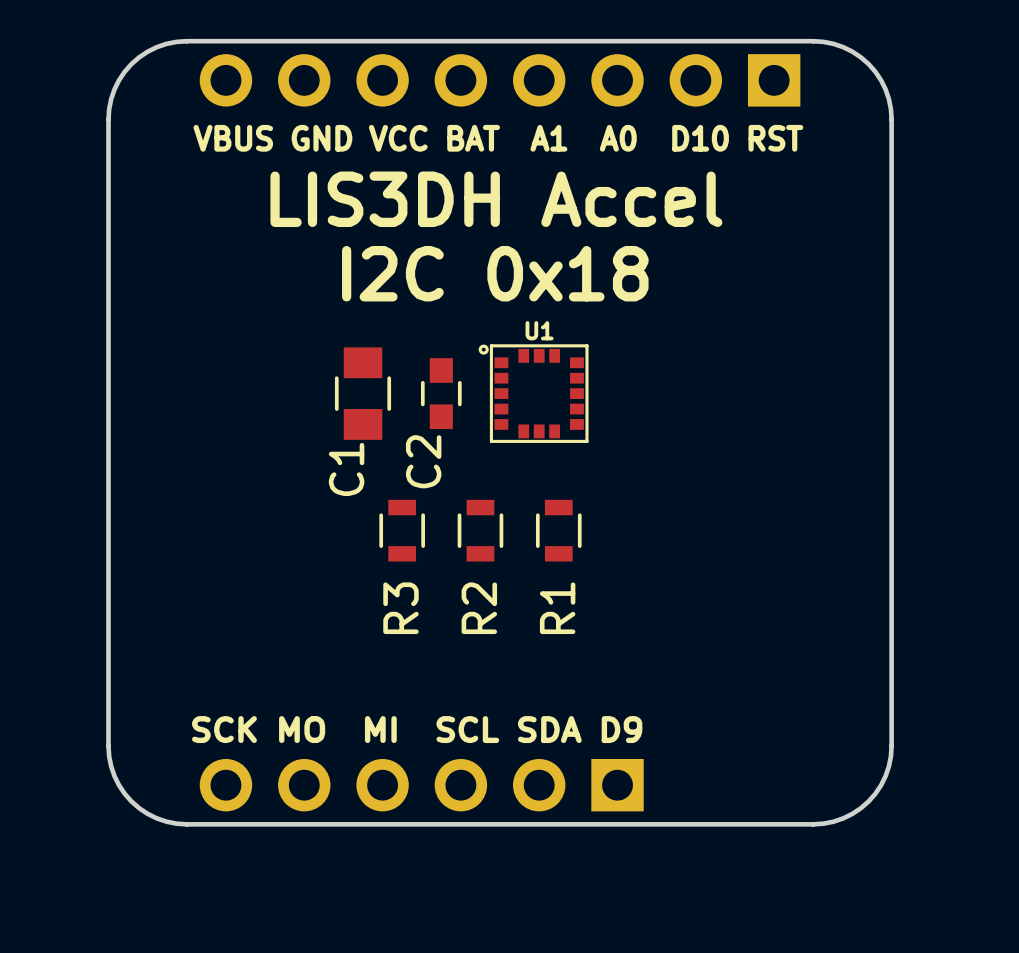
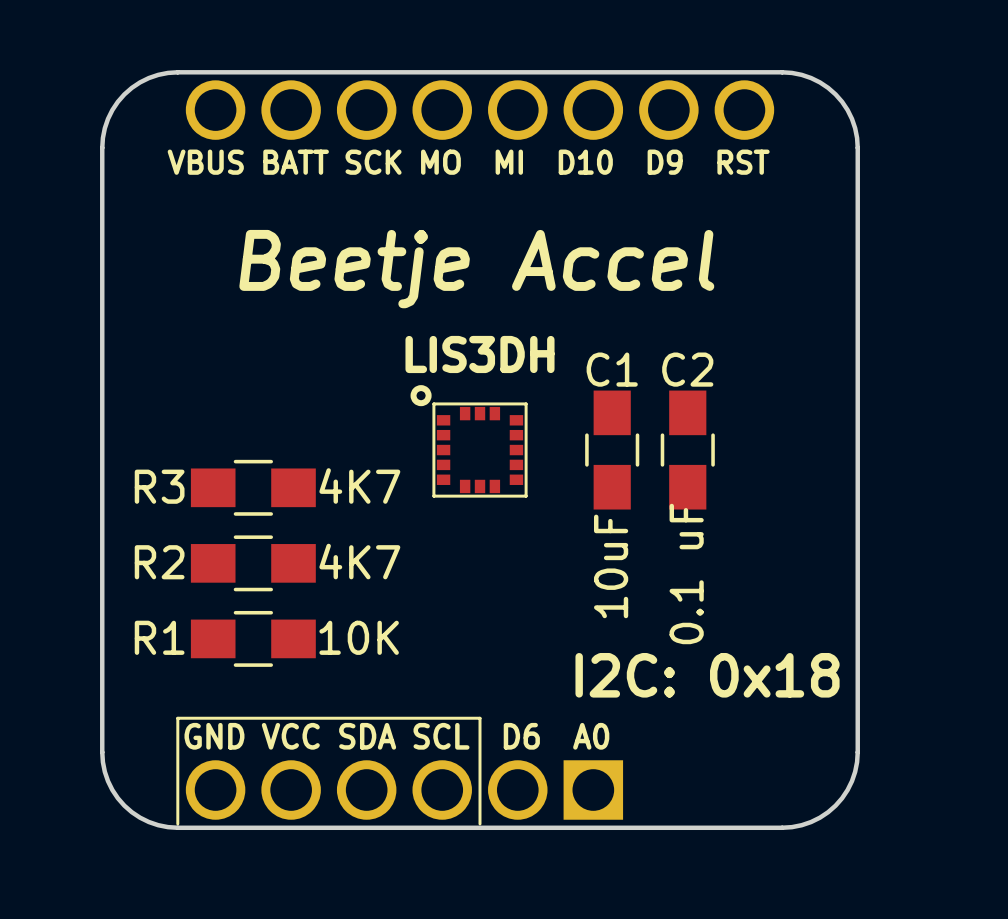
part footprint: [199, 54, 801, 107] -> [185, 80, 775, 140]
text: VBUS GND VCC BAT A1 A0 D10 RST (498, 138) -> none
text: LIS3DH Accel (496, 199) -> none
text: none -> Beetje Accel (476, 269)
text: I2C 0x18 (495, 273) -> none
text: none -> LIS3DH (480, 354)
C1 footprint: [334, 347, 392, 440] -> [585, 390, 640, 510]
C2 footprint: [420, 358, 462, 430] -> [660, 390, 715, 510]
U1: (533, 393) -> none
part: none -> (469, 441)
C2 name position: C2 (423, 461) -> C2 (687, 369)
C1 name position: C1 (346, 469) -> C1 (612, 369)
R3 value: none -> 4K7 (359, 485)
R3 footprint: [379, 499, 425, 562] -> [190, 459, 316, 516]
R2 footprint: [457, 499, 504, 562] -> [190, 535, 316, 592]
R1 footprint: [535, 499, 582, 562] -> [190, 610, 316, 667]
R2 value: none -> 4K7 (359, 561)
C1 value: none -> 10uF (611, 566)
C2 value: none -> 0.1 uF (686, 573)
R3 name position: R3 (401, 608) -> R3 (159, 486)
R2 name position: R2 (479, 608) -> R2 (159, 562)
R1 name position: R1 (557, 608) -> R1 (159, 637)
R1 value: none -> 10K (359, 637)
text: none -> I2C: 0x18 (707, 675)
text: SCK MO MI SCL SDA D9 (417, 729) -> none
part footprint: [199, 758, 644, 812] -> [176, 716, 624, 826]

